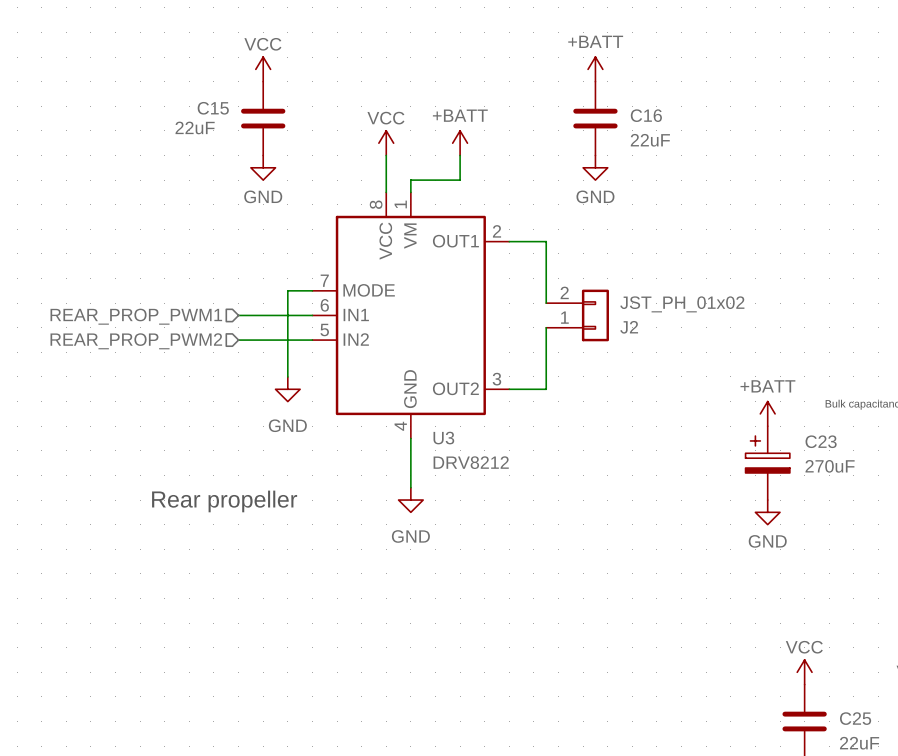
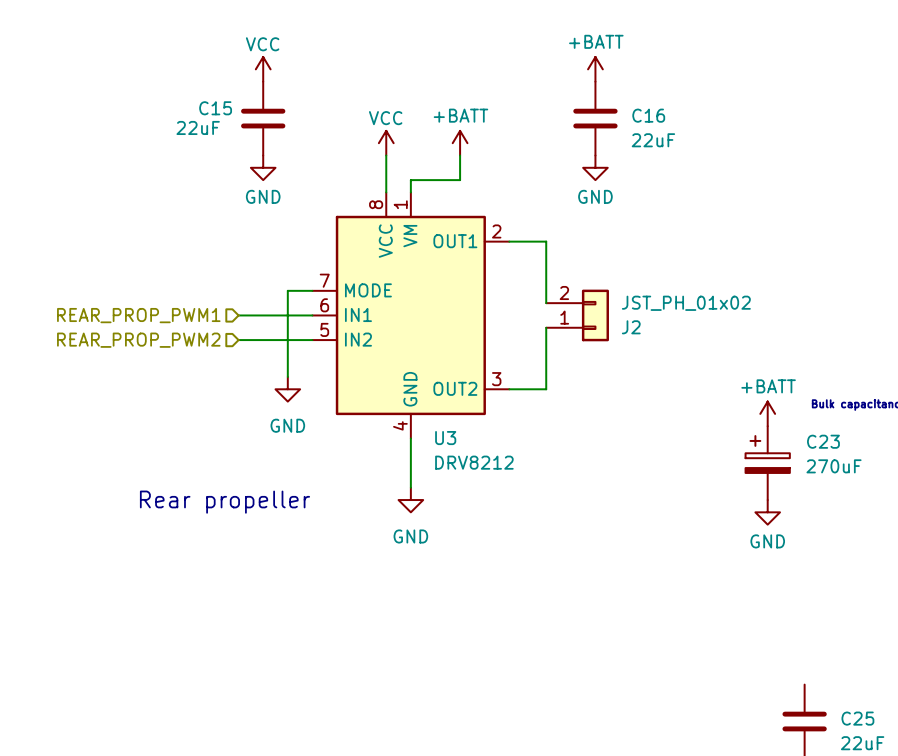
power symbol: VCC (804, 672) -> none

